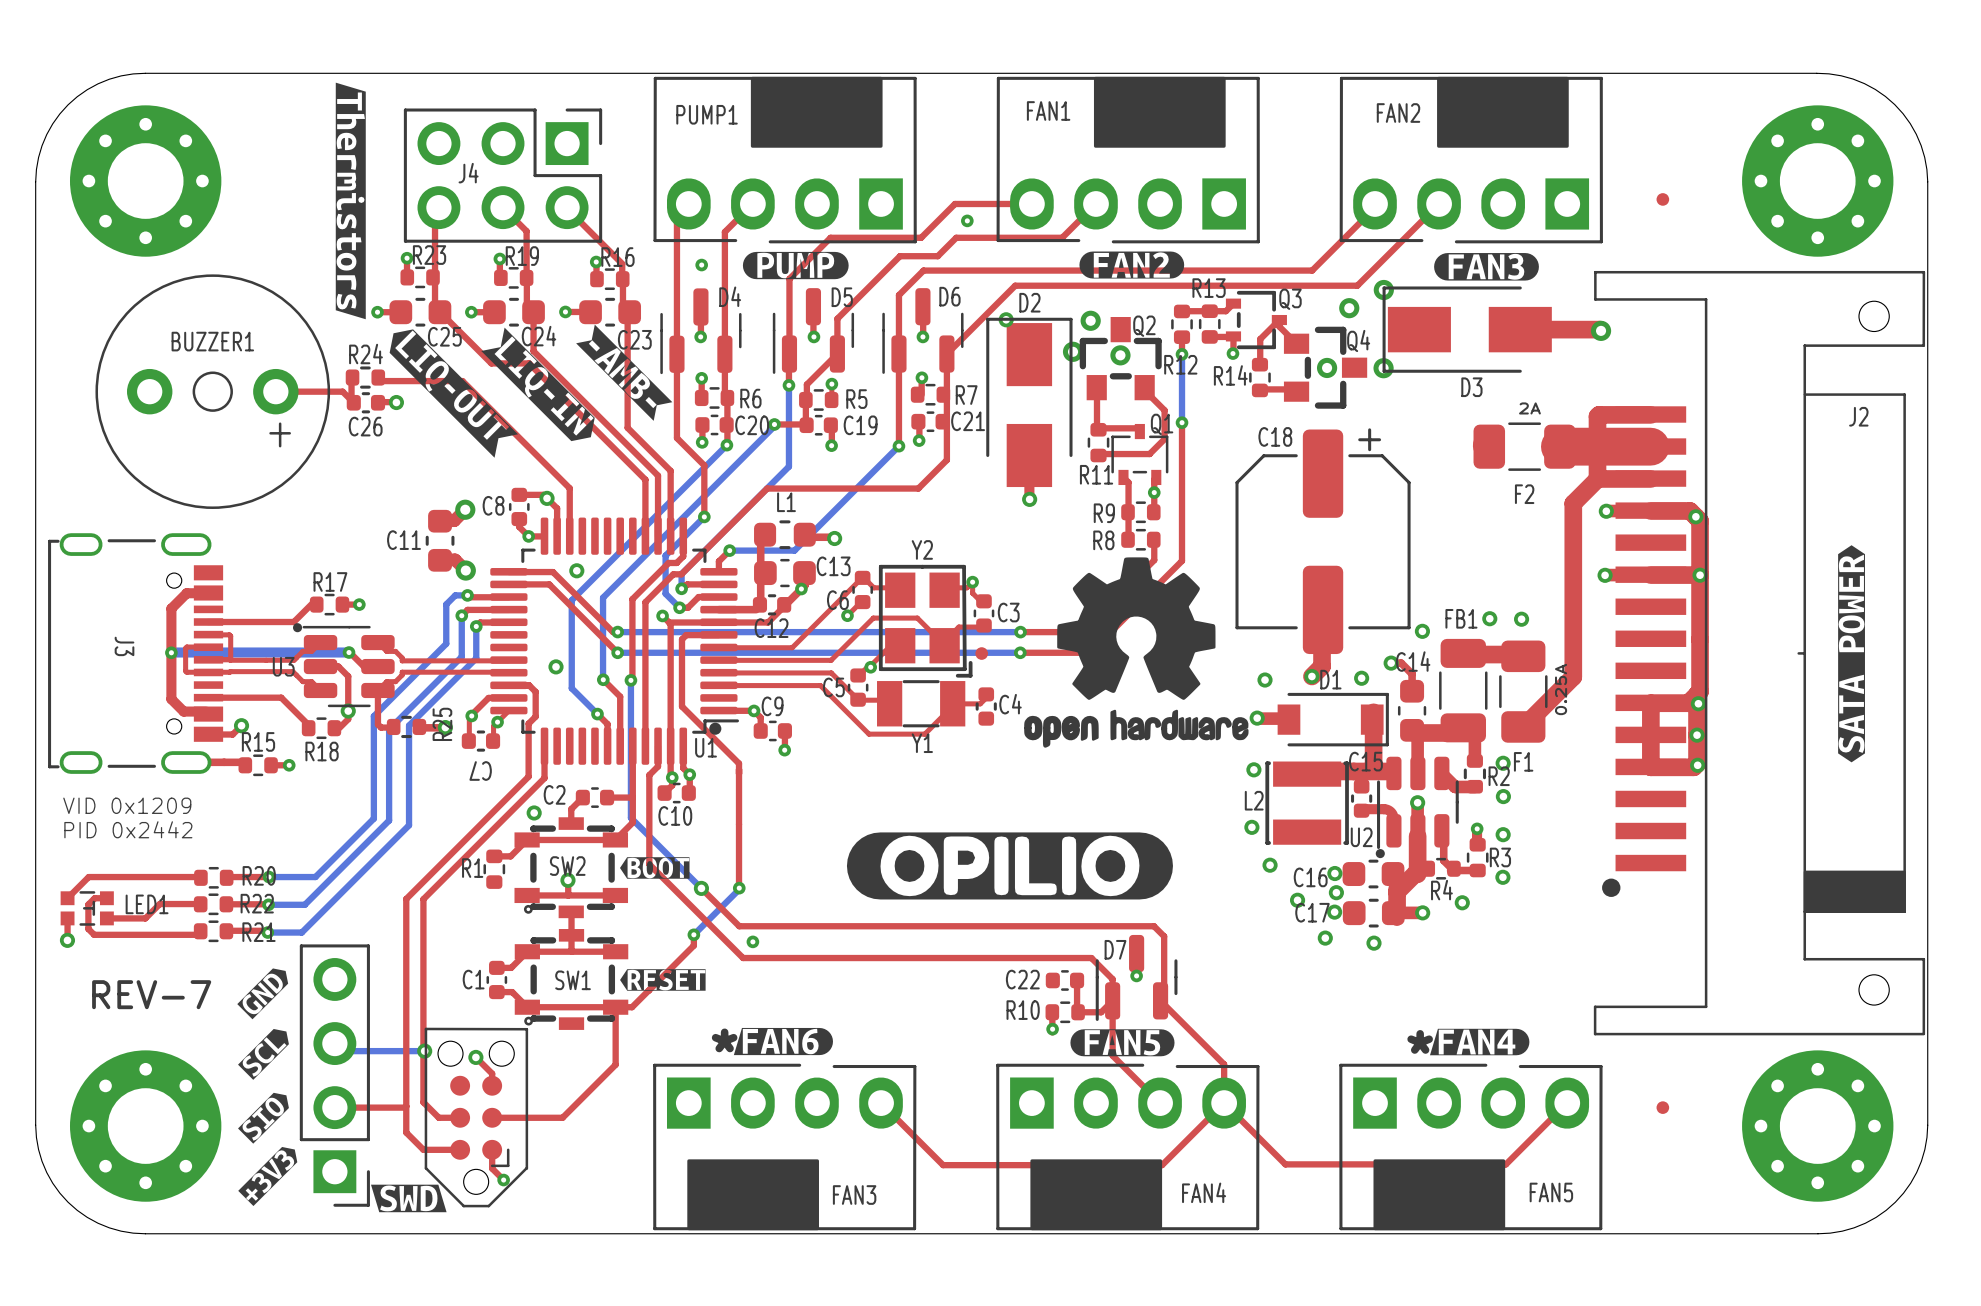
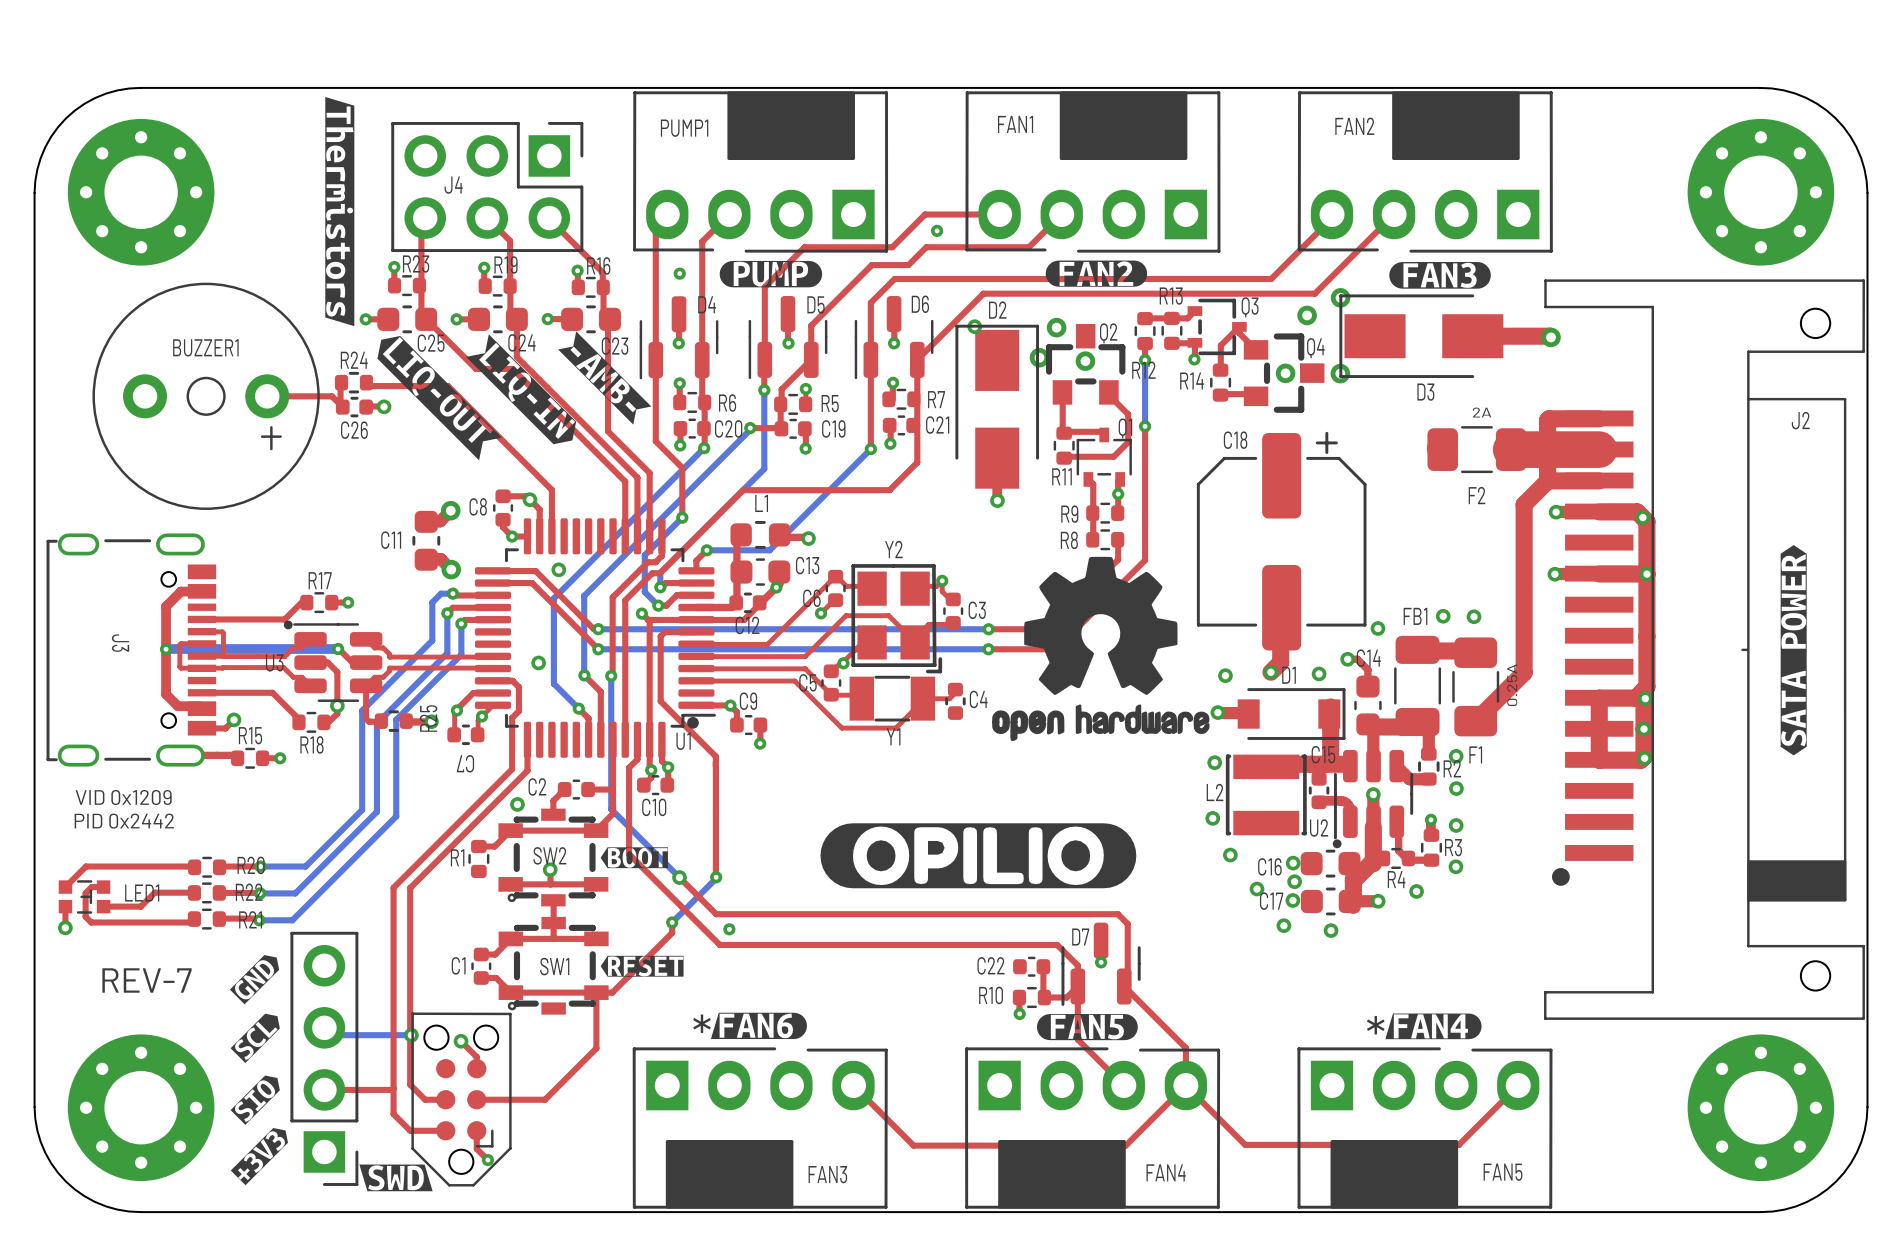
part: (1662, 199) -> none
part: (981, 653) -> none
part: (1662, 1107) -> none

